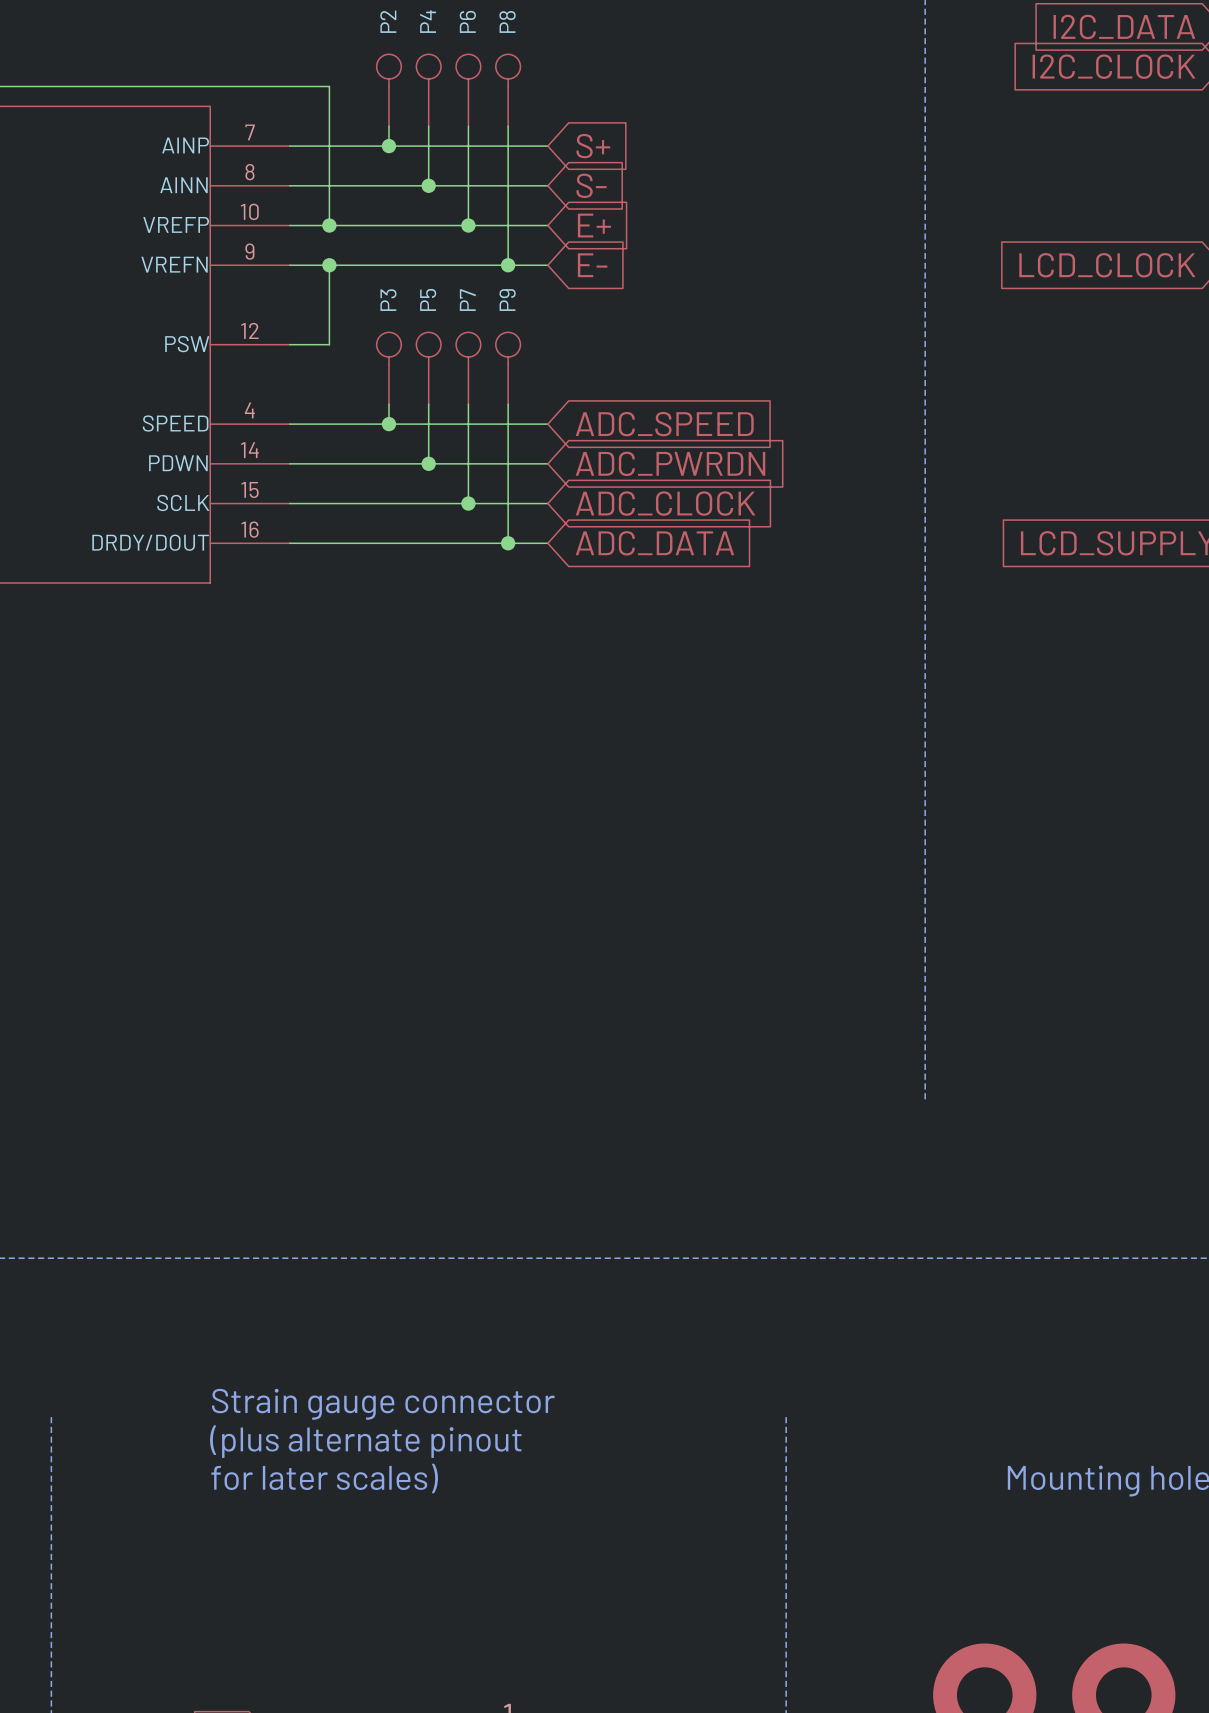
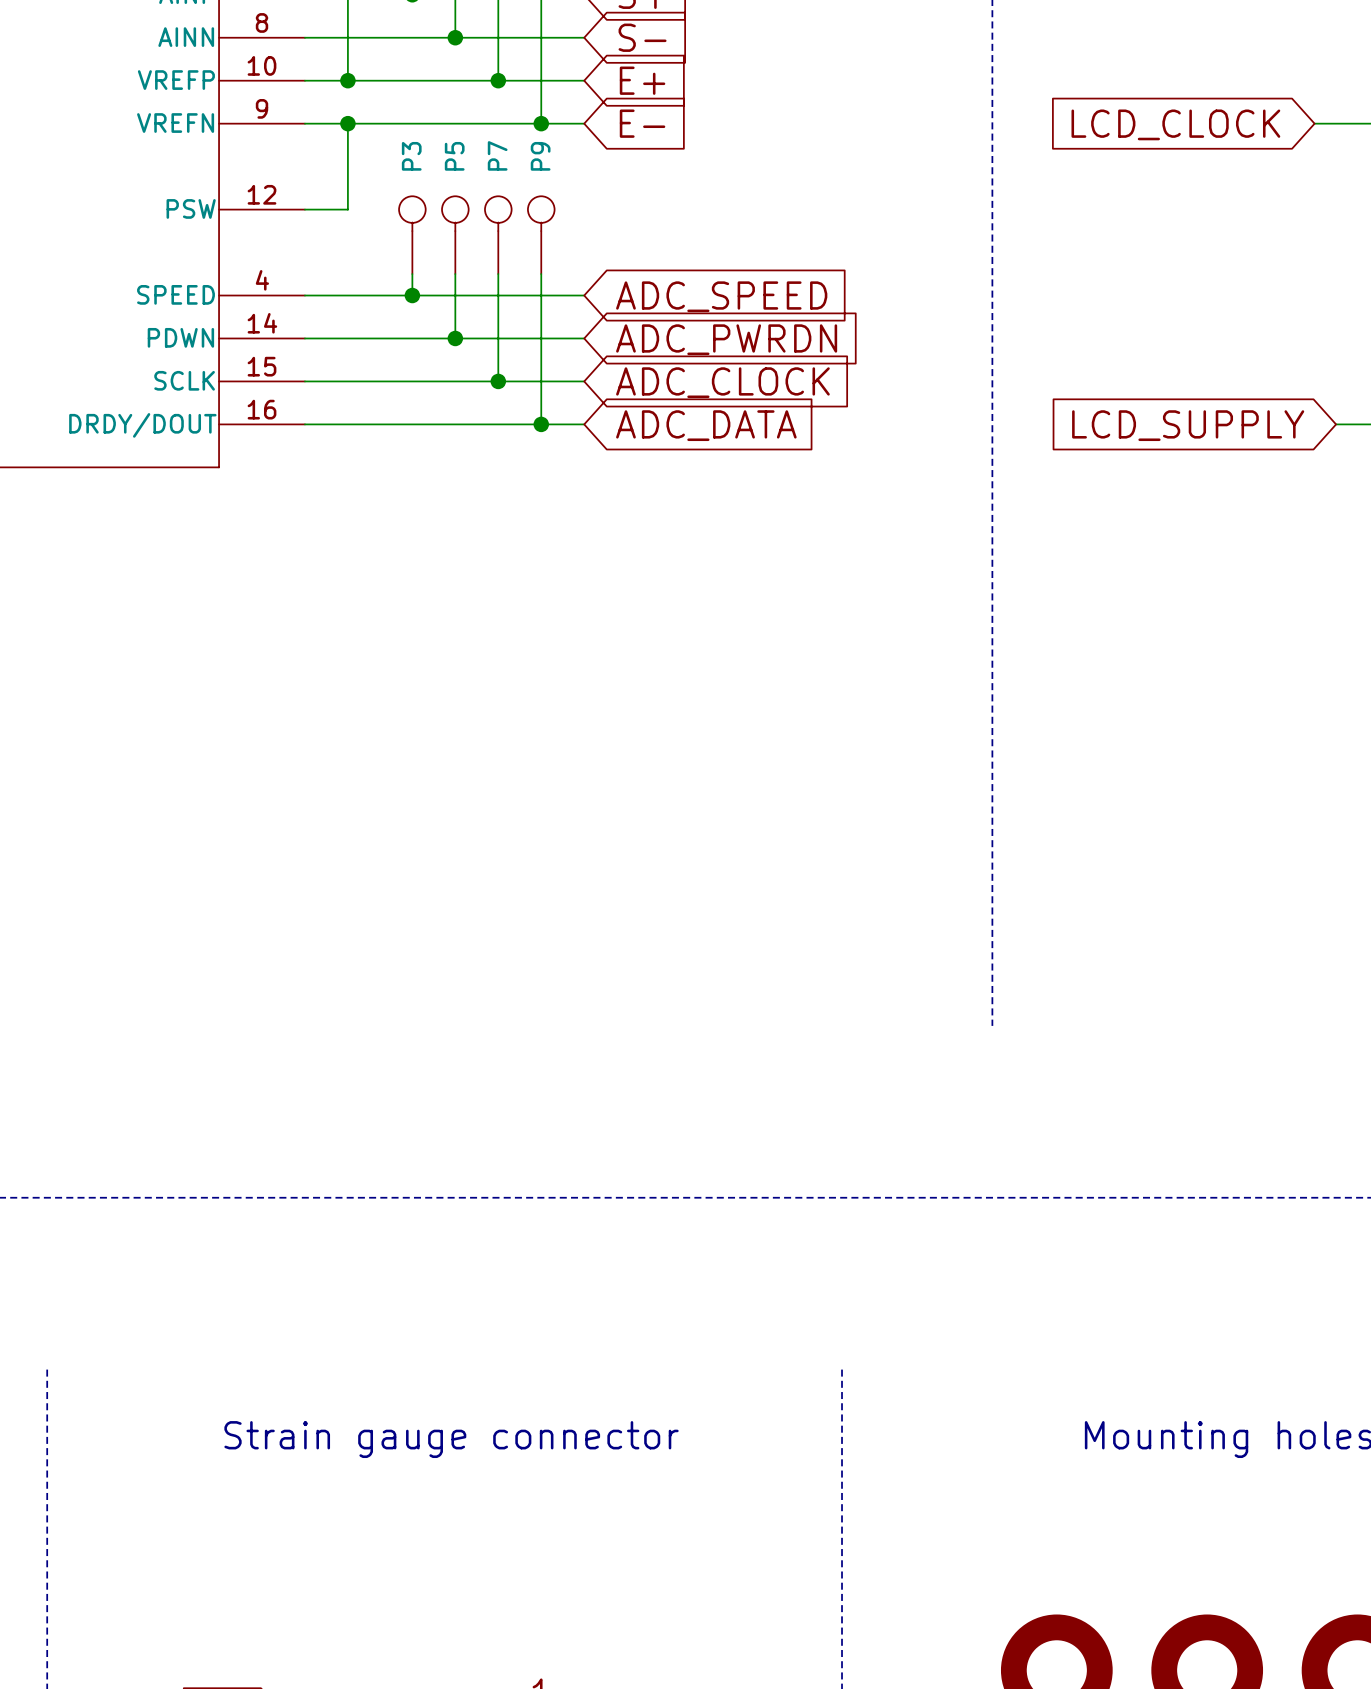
text: Strain gauge connector (383, 1404) -> none
text: (plus alternate pinout (365, 1441) -> none
text: for later scales) (324, 1478) -> Strain gauge connector (451, 1439)

